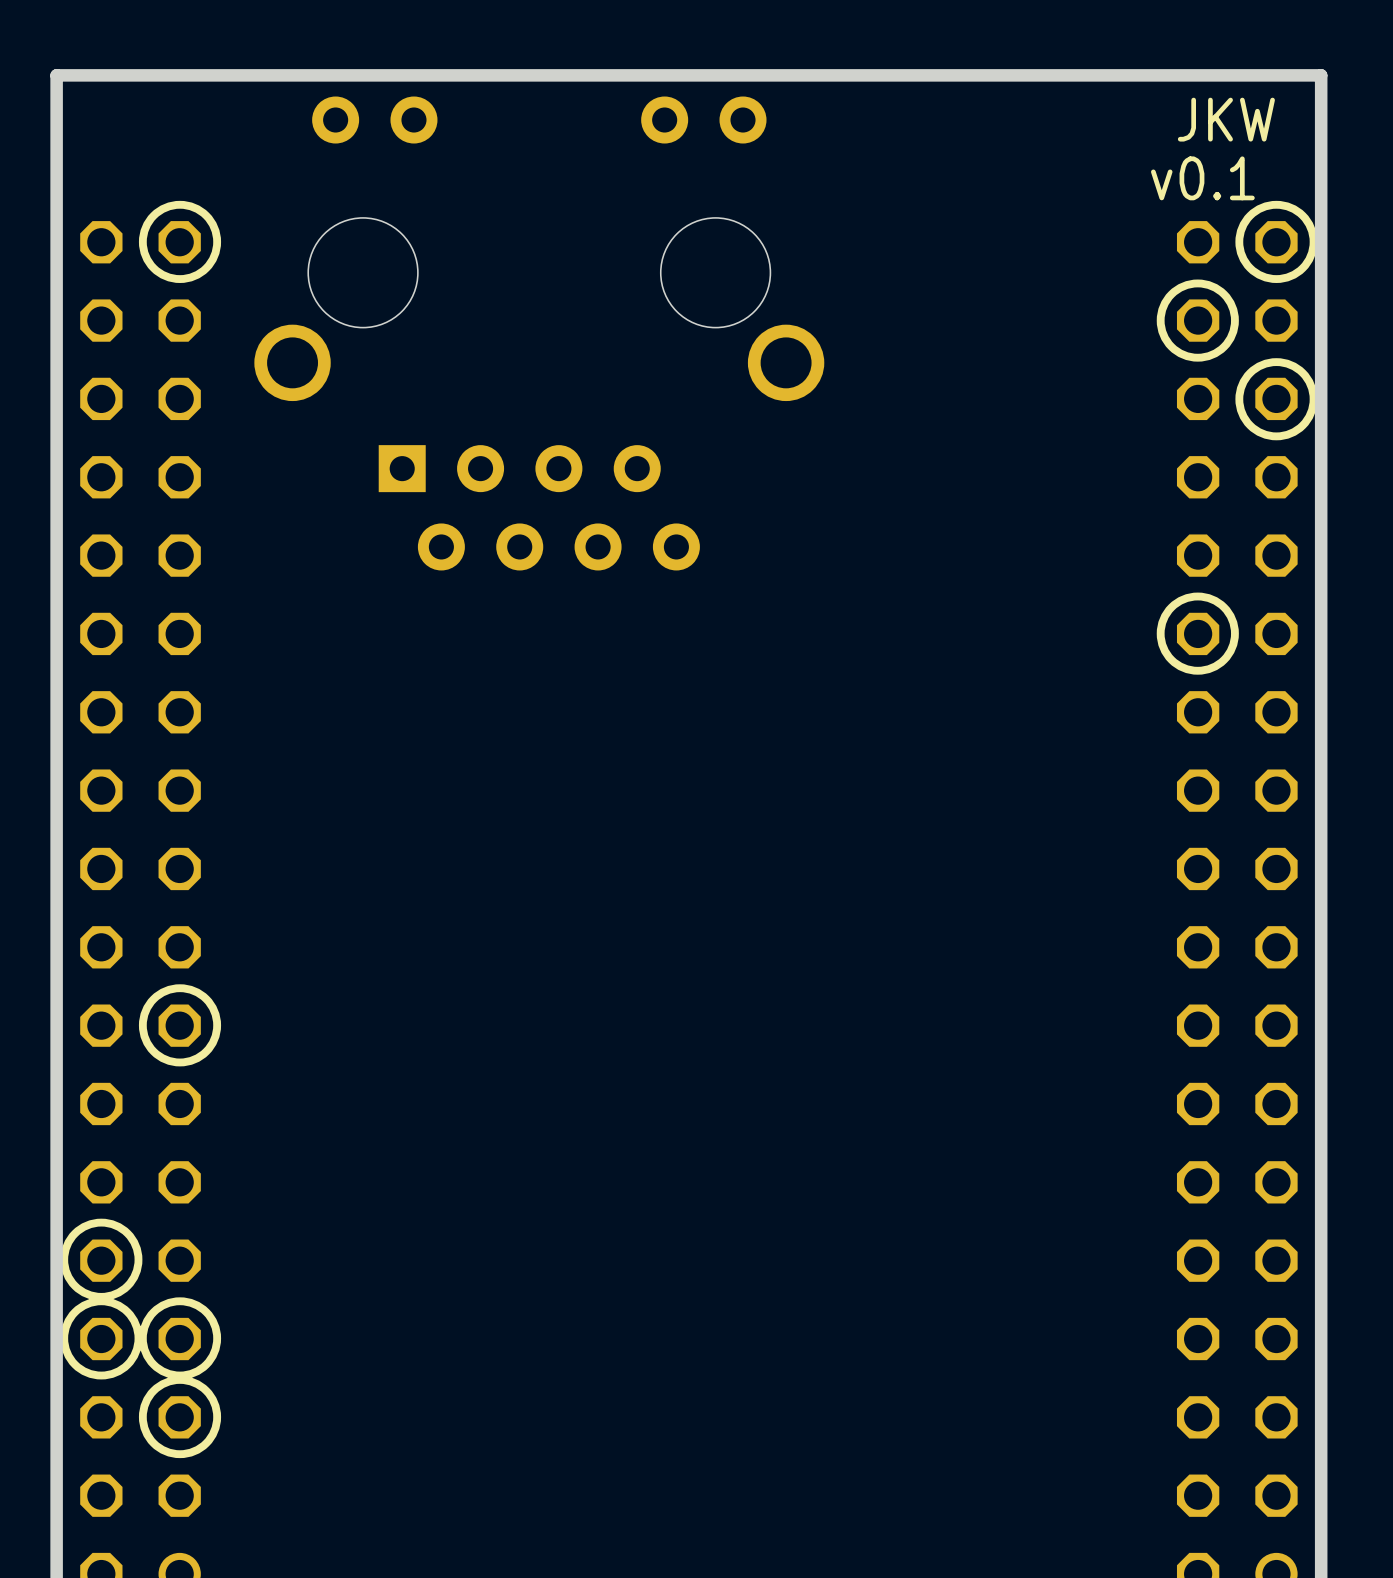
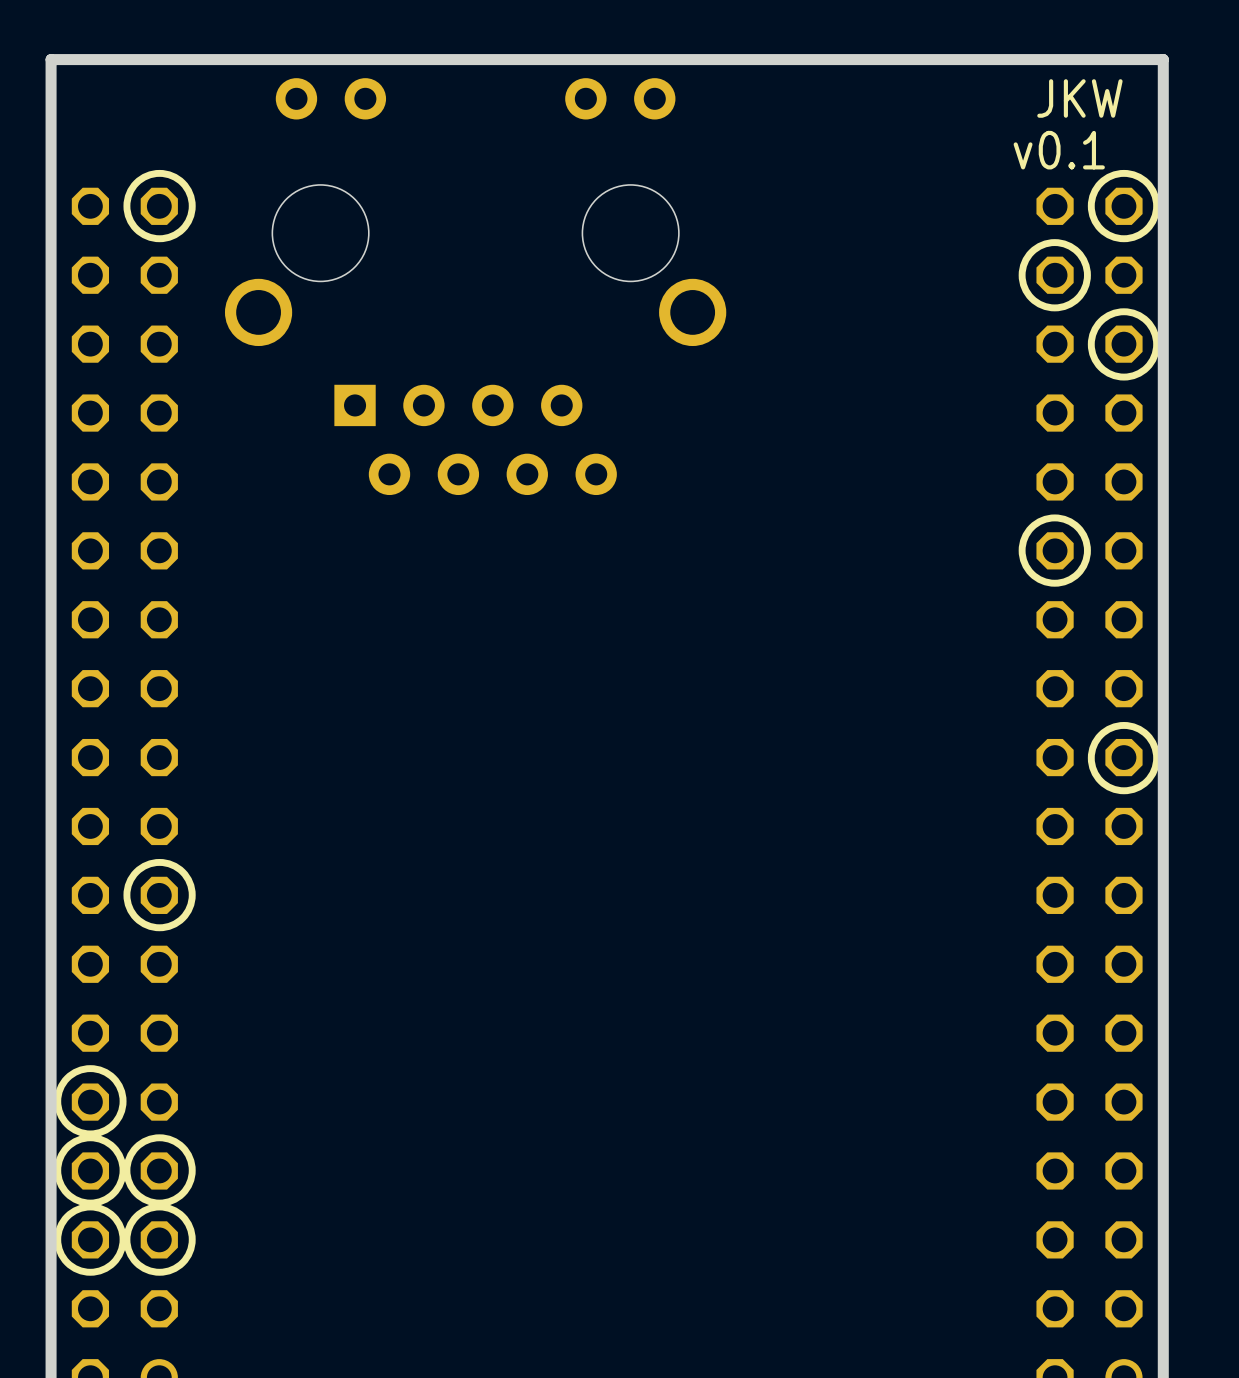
drawing: none -> [1087, 721, 1161, 795]
drawing: none -> [54, 1203, 127, 1276]

